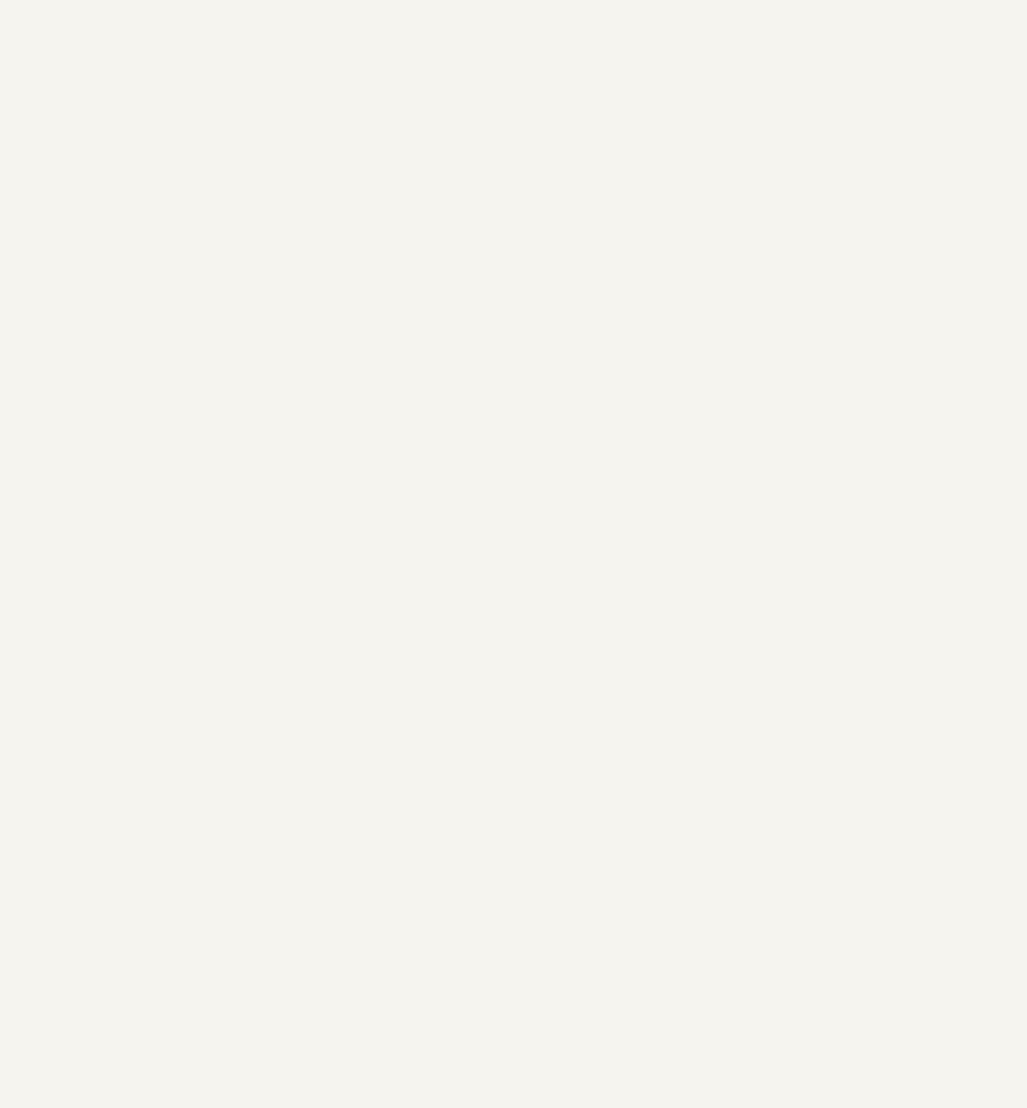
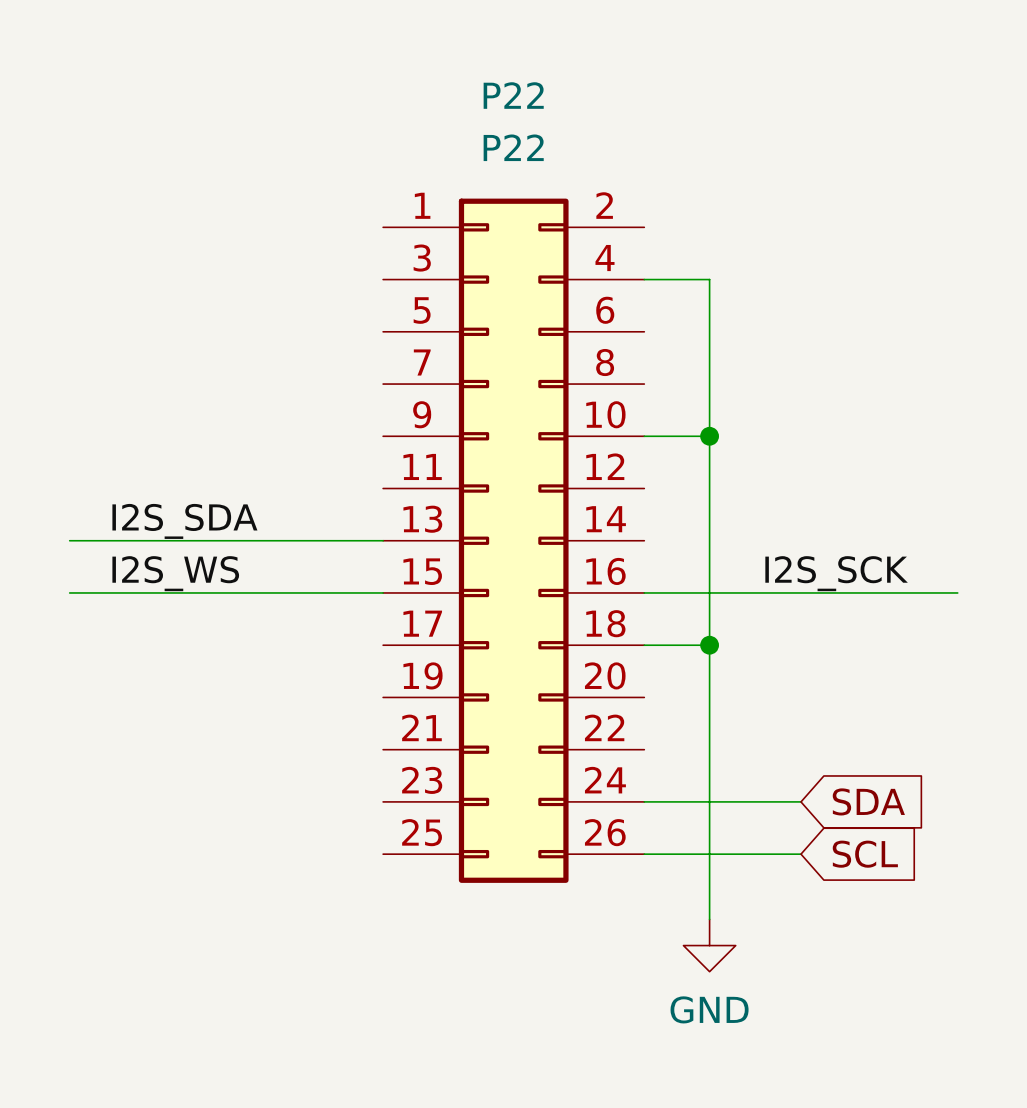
wire: none -> (644, 279) (709, 279) (709, 919)
wire: none -> (644, 436) (709, 436)
junction: none -> (709, 436)
label: none -> I2S_SDA (184, 521)
wire: none -> (69, 540) (383, 540)
P22: none -> P22 (513, 540)
label: none -> I2S_WS (175, 573)
label: none -> I2S_SCK (836, 573)
wire: none -> (69, 592) (383, 592)
wire: none -> (644, 592) (957, 592)
wire: none -> (644, 645) (709, 645)
junction: none -> (709, 645)
wire: none -> (644, 801) (801, 801)
global label: none -> SDA (868, 801)
wire: none -> (644, 854) (801, 854)
global label: none -> SCL (865, 854)
power symbol: none -> GND (709, 945)

